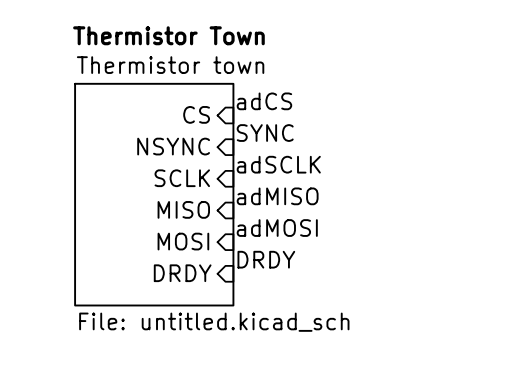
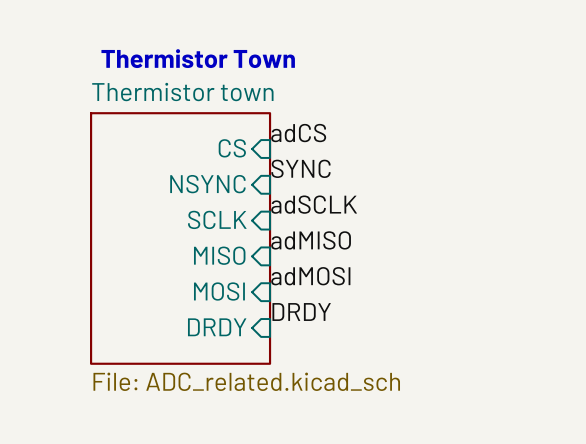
sheet Thermistor town value: File: untitled.kicad_sch (214, 322) -> File: ADC_related.kicad_sch (246, 381)

